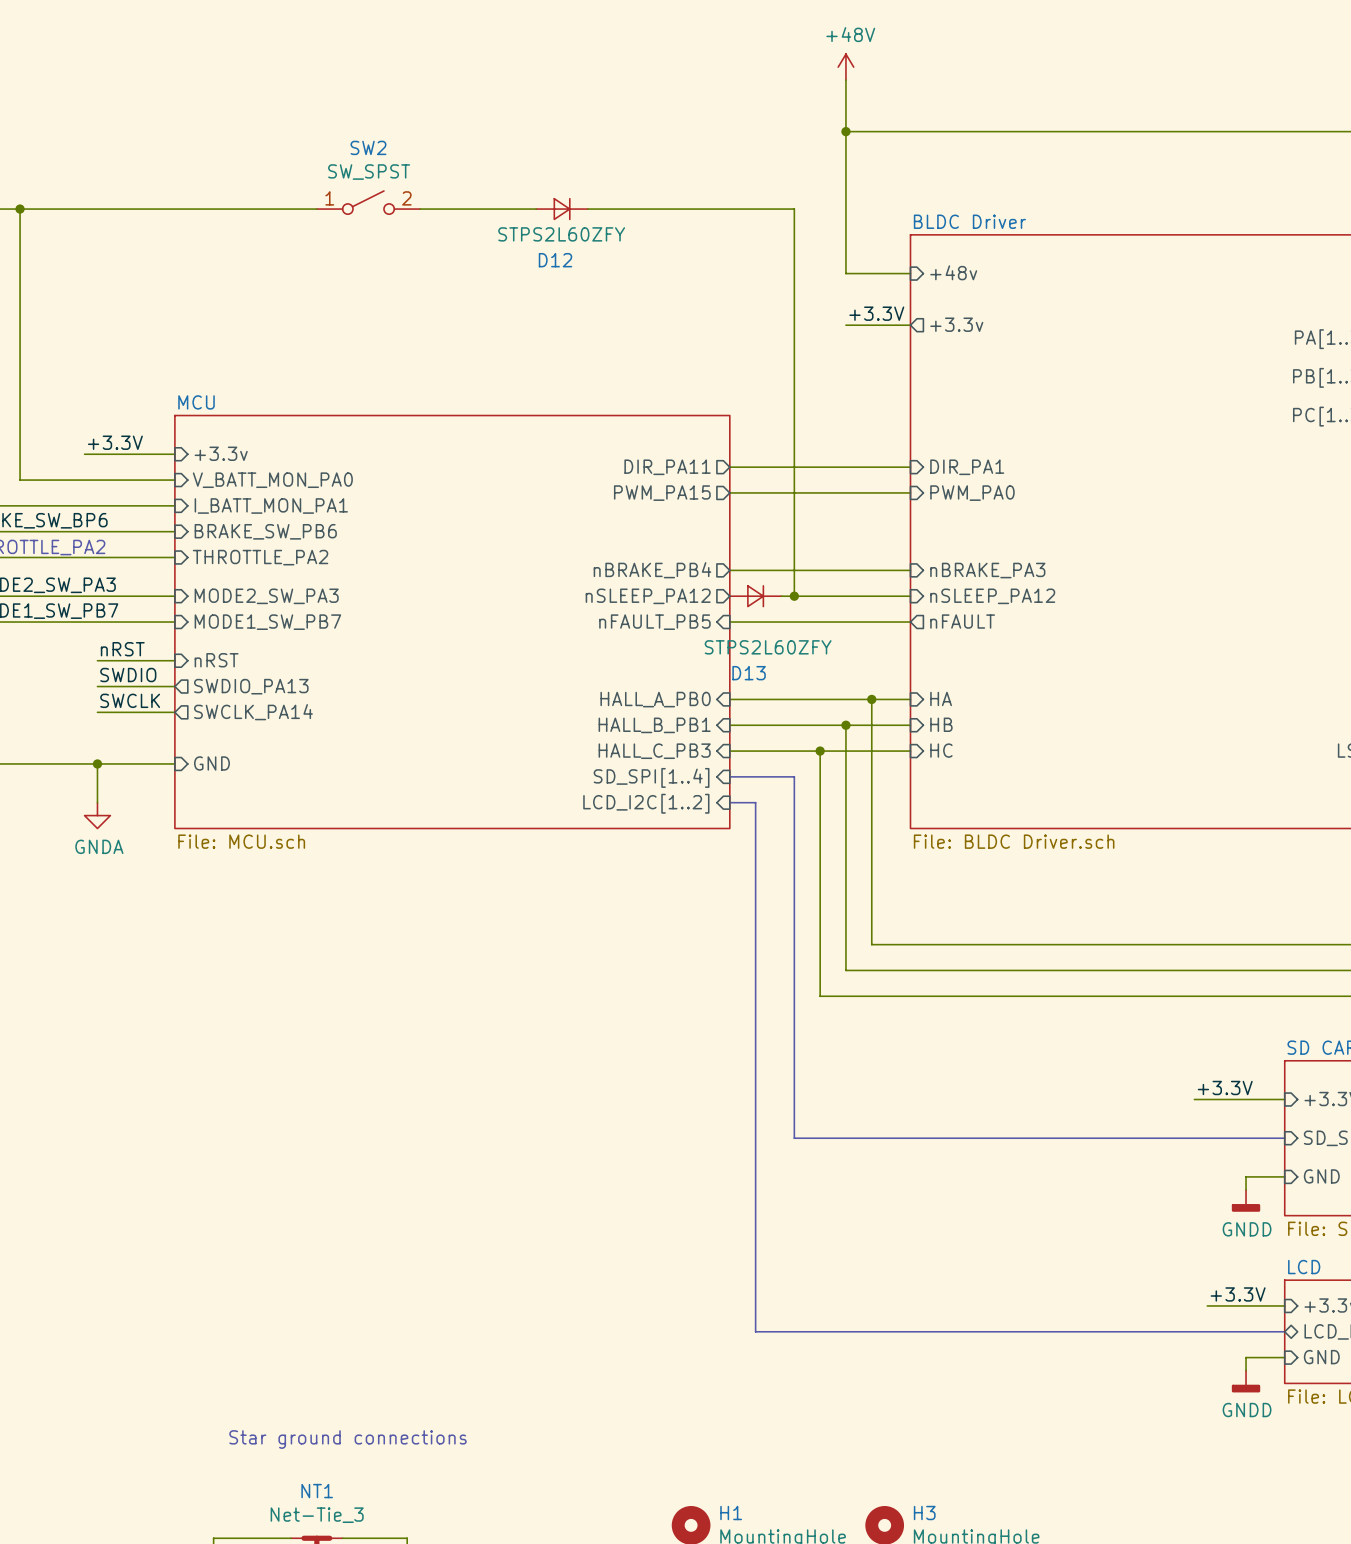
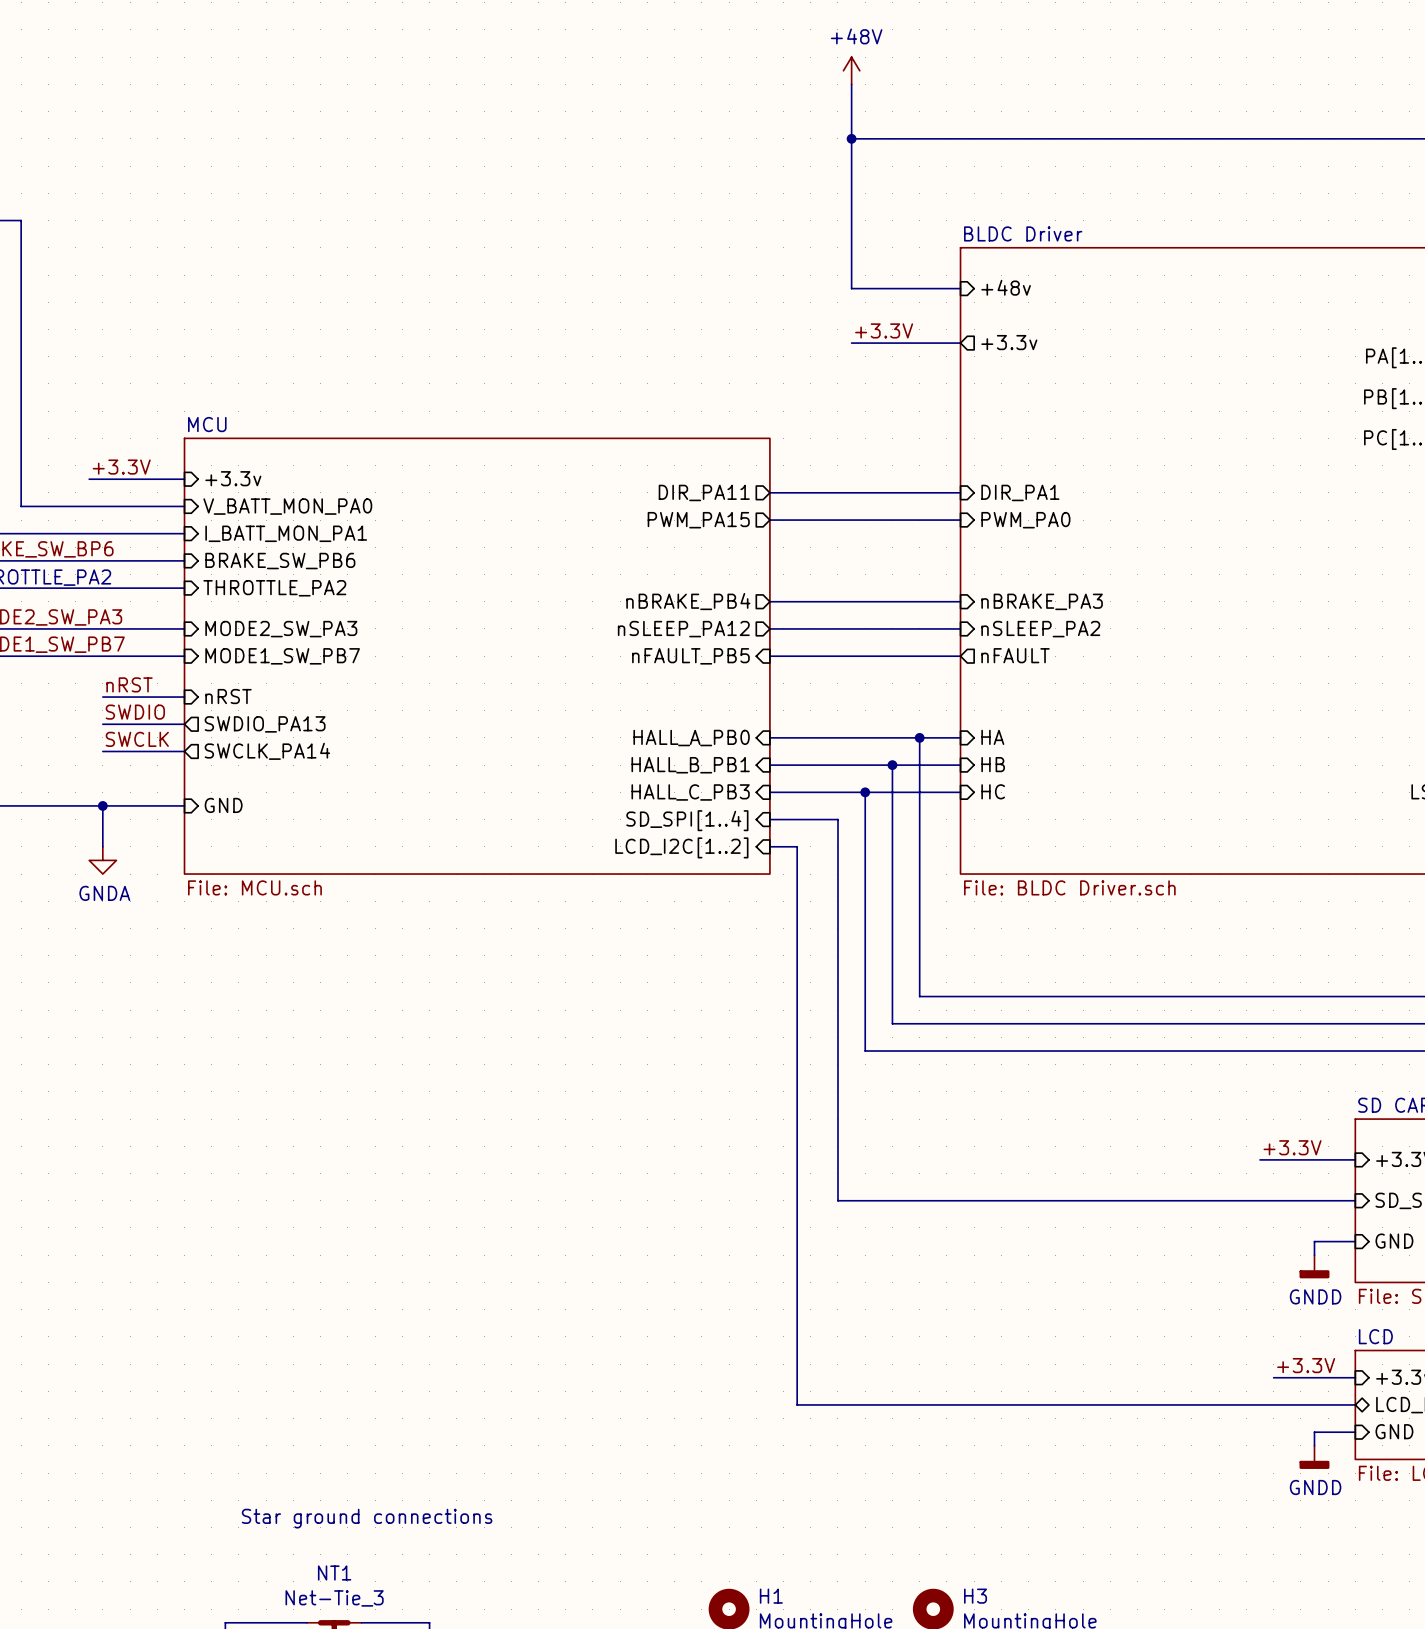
power symbol position: +48V (845, 67) -> +48V (851, 70)
wire: (845, 80) (845, 273) -> (851, 84) (851, 288) (892, 288)
wire: none -> (851, 138) (892, 138)
junction position: (845, 131) -> (851, 138)
SW2: SW_SPST (368, 202) -> none
wire: (20, 209) (316, 209) -> none
junction: (20, 209) -> none
wire: (420, 209) (536, 209) -> none
D12: STPS2L60ZFY (562, 209) -> none
wire: (587, 209) (794, 209) (794, 596) -> none
label position: +3.3V (876, 313) -> +3.3V (884, 330)
wire: none -> (851, 343) (892, 343)
D13: STPS2L60ZFY (755, 596) -> none
junction: (794, 596) -> none
sheet pin: nSLEEP_PA12 (992, 596) -> nSLEEP_PA2 (1040, 629)

